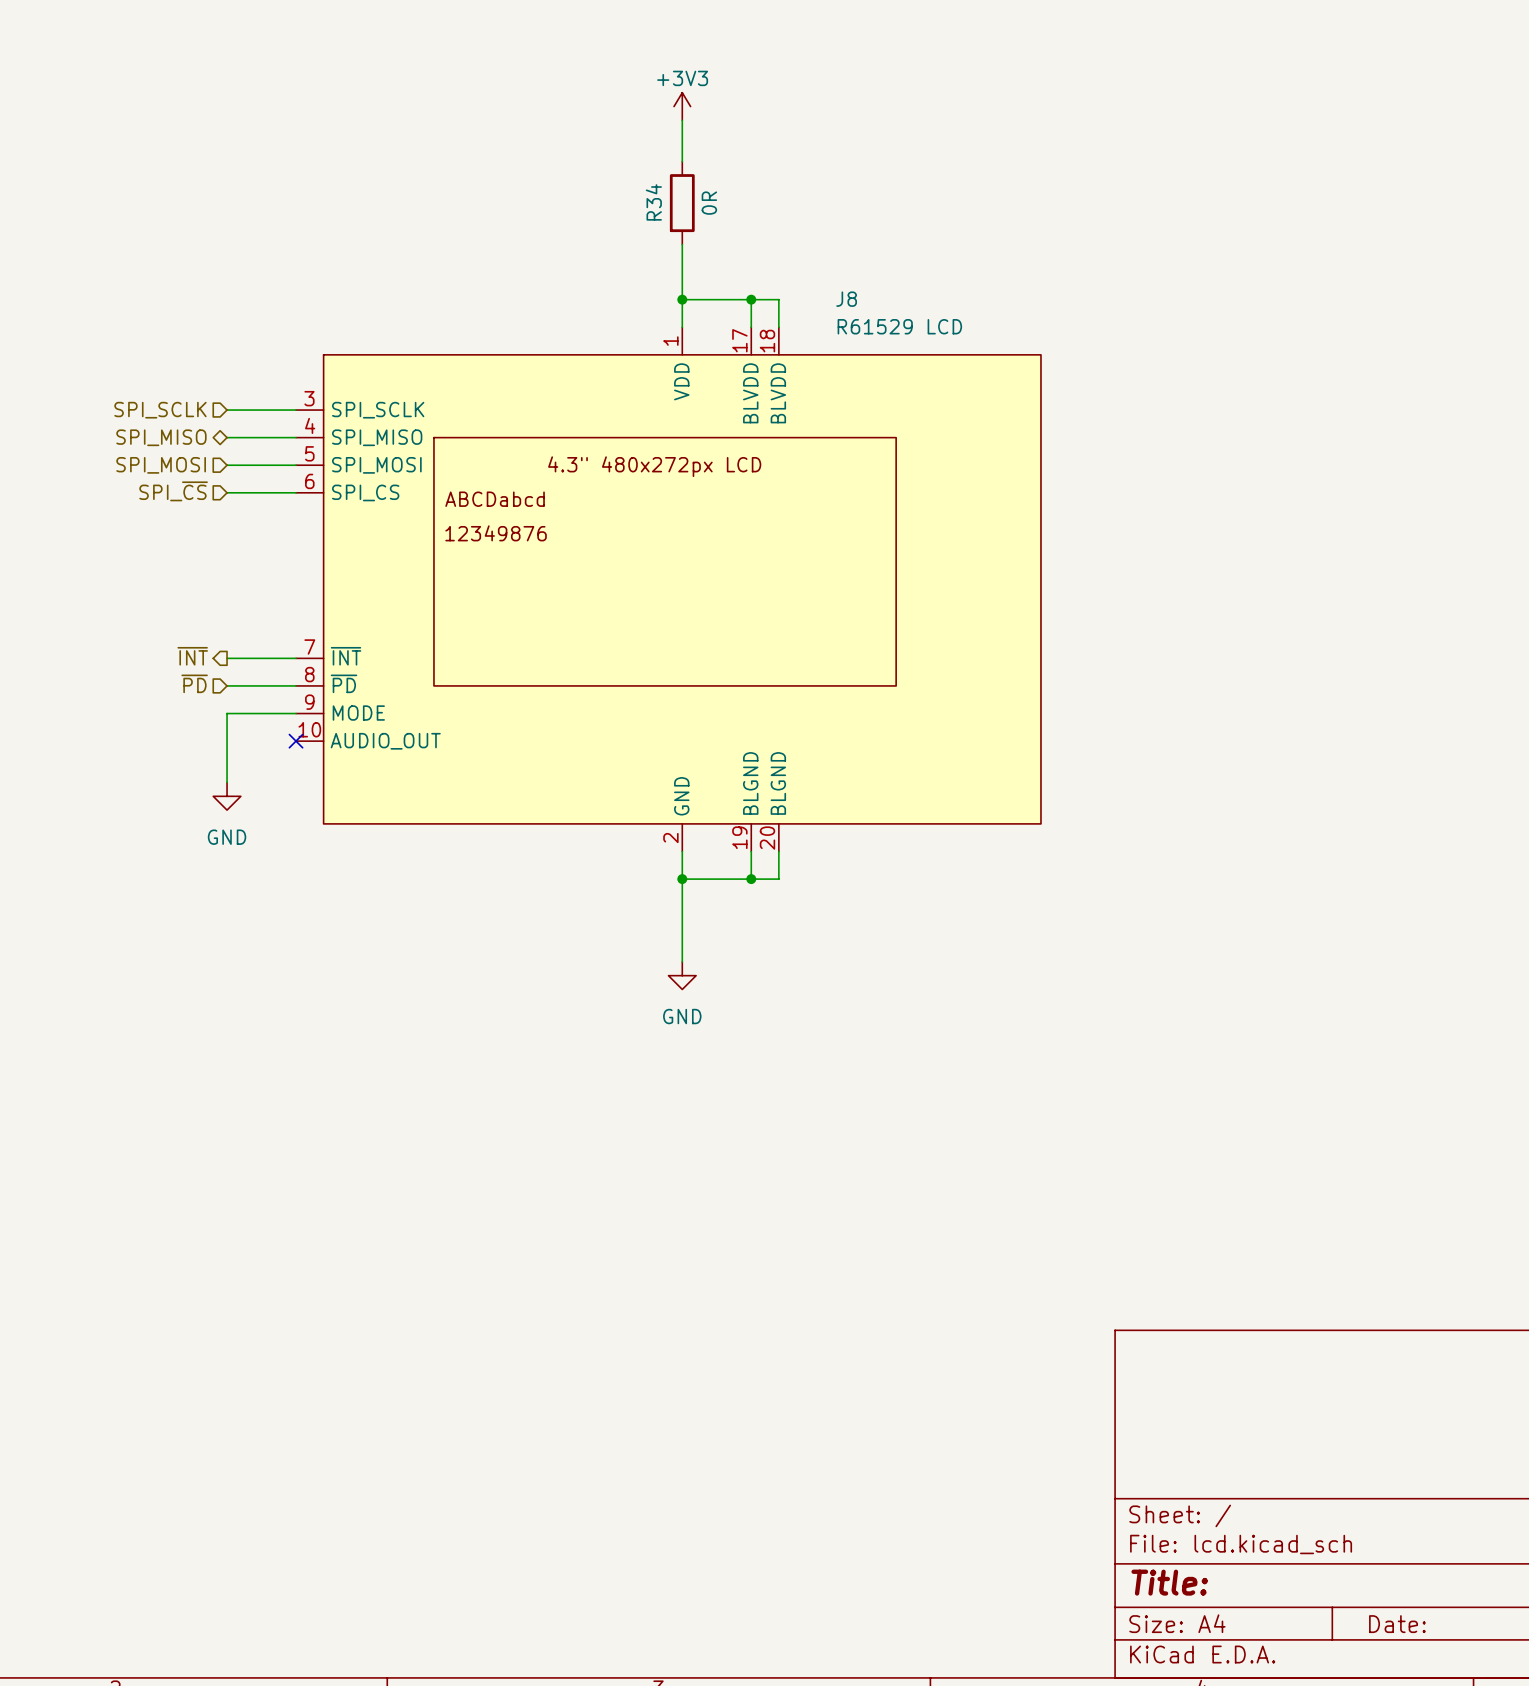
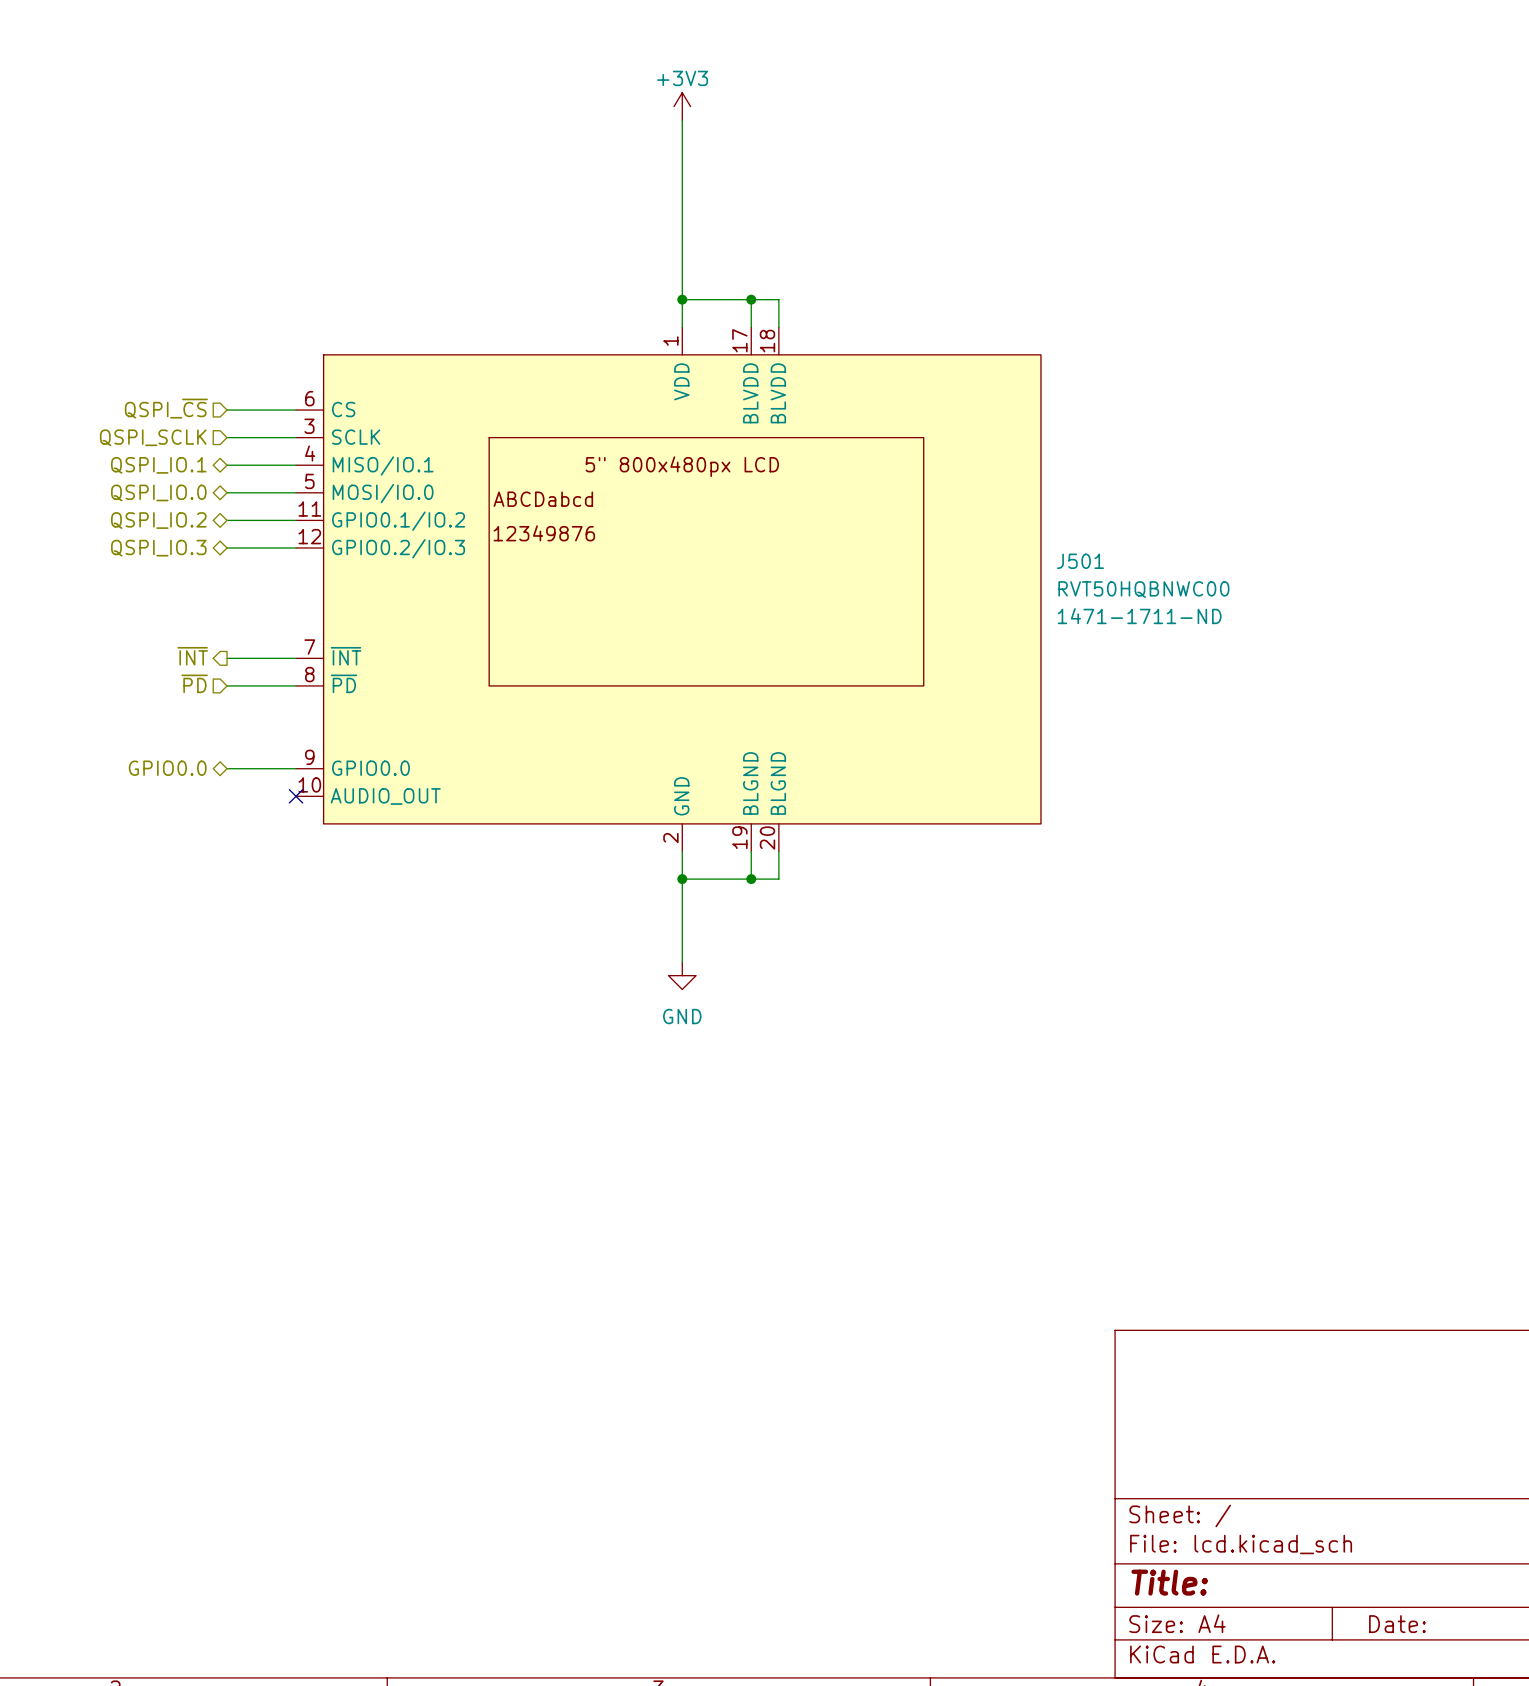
wire: none -> (682, 161) (682, 244)
R34: 0R (682, 203) -> none
hierarchical label: SPI_SCLK (160, 410) -> QSPI_~{CS} (166, 408)
hierarchical label shape: bidirectional (161, 437) -> input (153, 437)
hierarchical label: SPI_MISO (161, 437) -> QSPI_SCLK (153, 437)
hierarchical label shape: input (161, 465) -> bidirectional (158, 465)
hierarchical label: SPI_MOSI (161, 465) -> QSPI_IO.1 (158, 465)
hierarchical label shape: input (173, 491) -> bidirectional (158, 492)
hierarchical label: SPI_~{CS} (173, 491) -> QSPI_IO.0 (158, 492)
hierarchical label: none -> QSPI_IO.2 (158, 520)
wire: none -> (227, 520) (296, 520)
wire: none -> (227, 547) (296, 547)
hierarchical label: none -> QSPI_IO.3 (158, 548)
J8: R61529 LCD (668, 589) -> none
J501: none -> RVT50HQBNWC00 (668, 589)
wire: (296, 713) (227, 713) (227, 782) -> none
no-connect mark position: (296, 741) -> (296, 796)
hierarchical label: none -> GPIO0.0 (167, 768)
wire: none -> (227, 768) (296, 768)
power symbol: GND (227, 796) -> none

